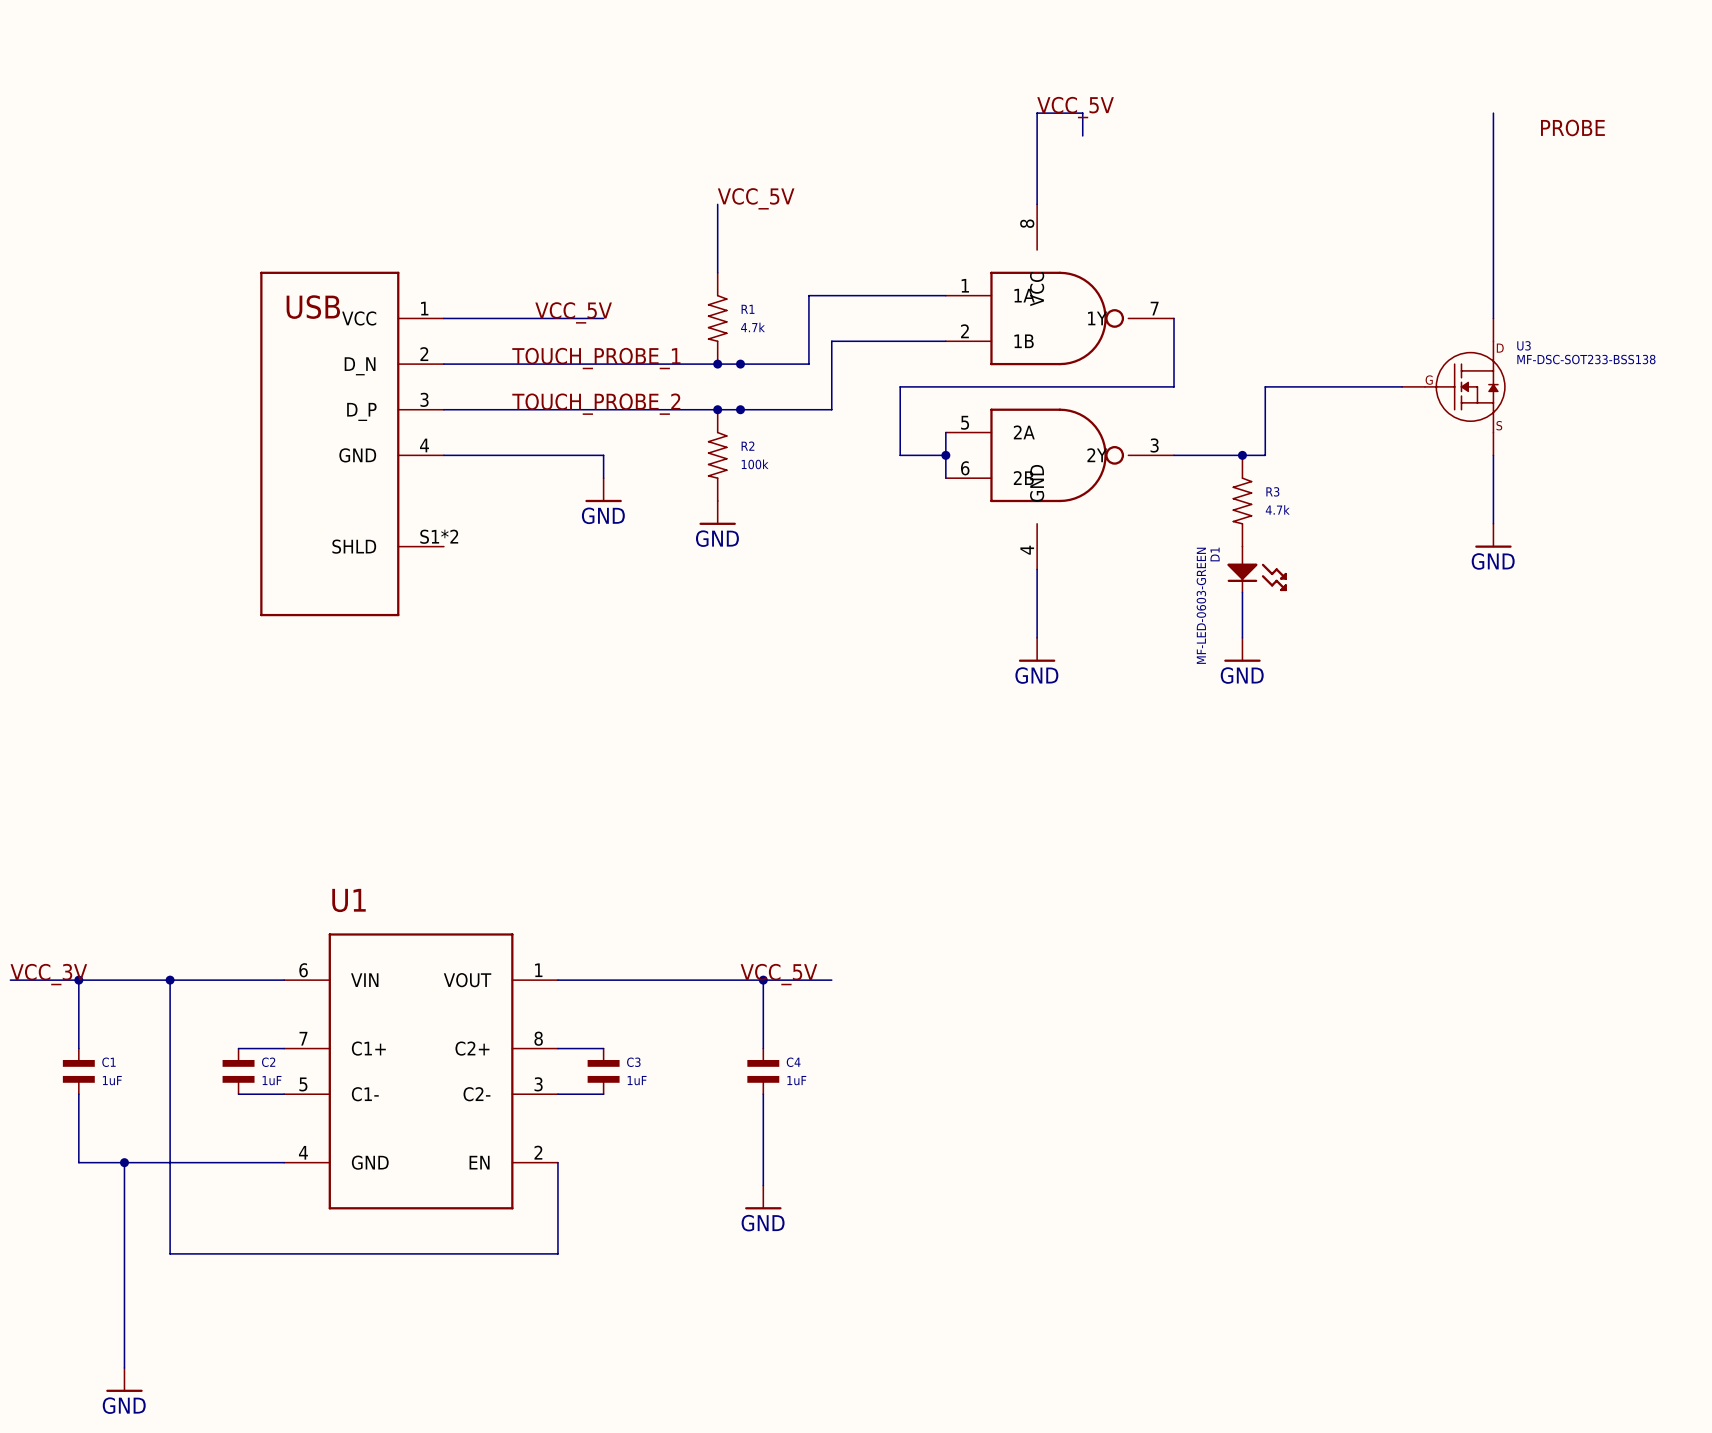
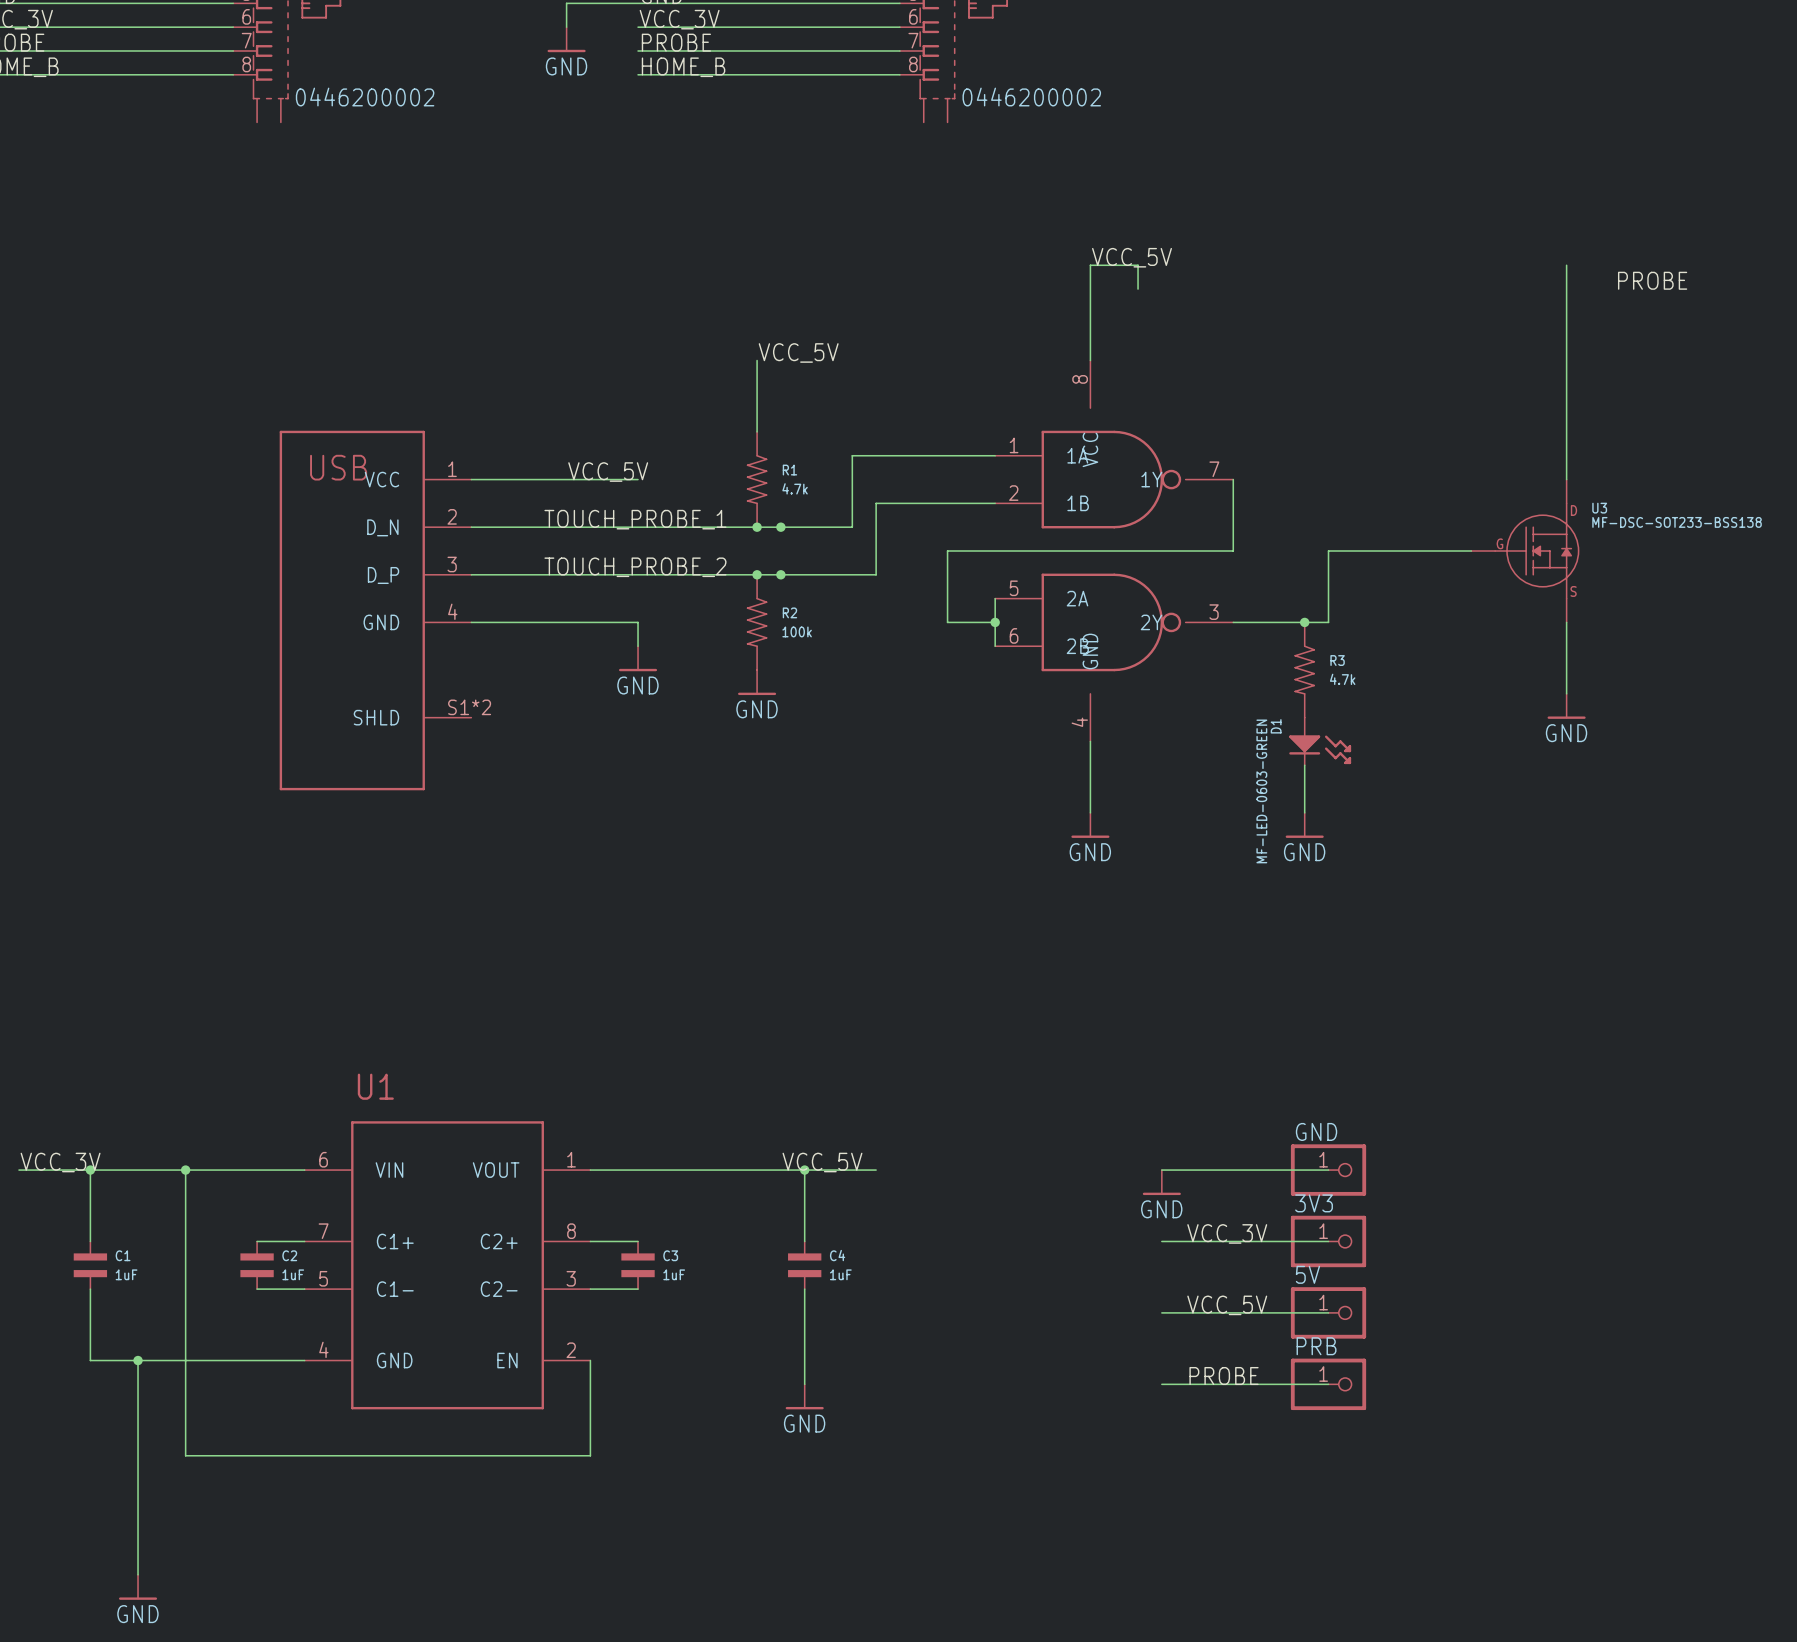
wire: none -> (1161, 1170) (1328, 1170)
GND: none -> (1328, 1170)
power symbol: none -> GND (1161, 1182)
label: none -> VCC_3V (1227, 1233)
wire: none -> (1161, 1241) (1328, 1241)
3V3: none -> (1328, 1241)
label: none -> VCC_5V (1227, 1305)
wire: none -> (1161, 1312) (1328, 1312)
5V: none -> (1328, 1312)
label: none -> PROBE (1224, 1376)
wire: none -> (1161, 1384) (1328, 1384)
PRB: none -> (1328, 1384)

